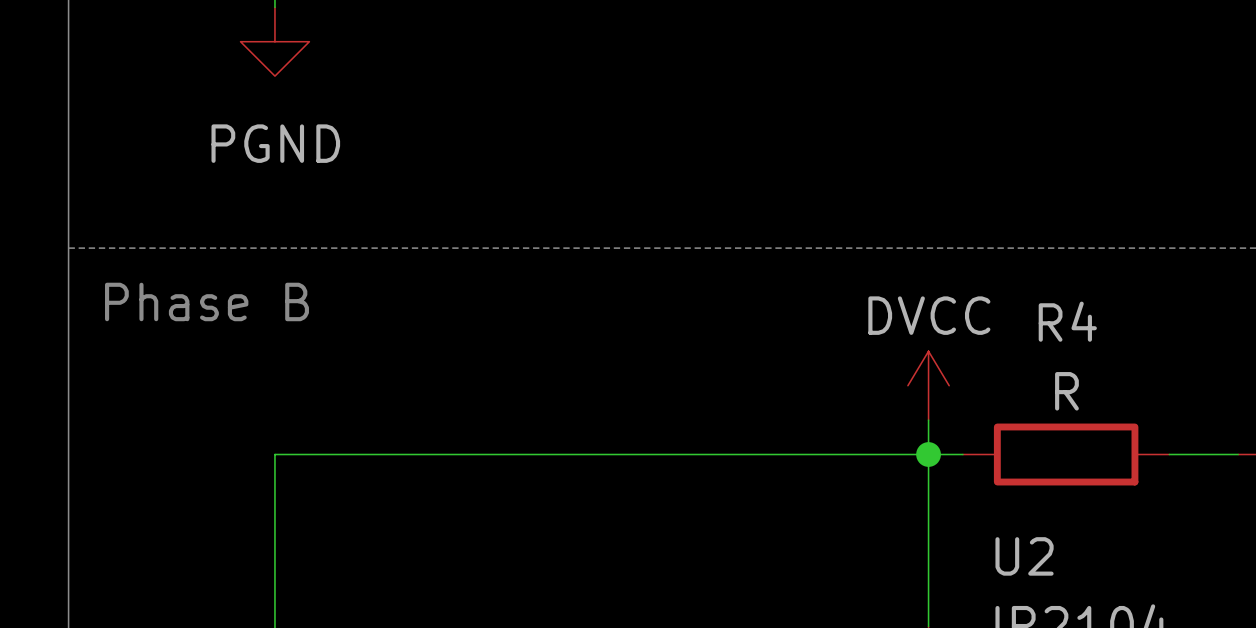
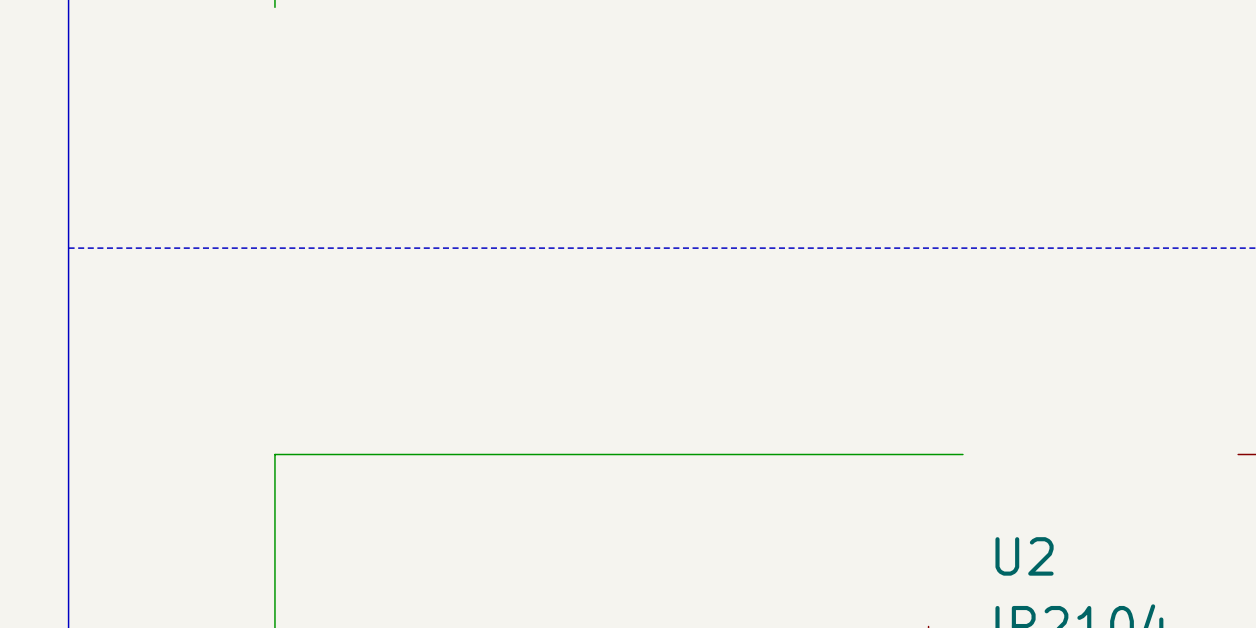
power symbol: PGND (274, 41) -> none
text: Phase B (206, 301) -> none
power symbol: DVCC (928, 385) -> none
wire: (928, 420) (928, 626) -> none
junction: (928, 454) -> none
R4: R (1066, 454) -> none
wire: (1169, 454) (1238, 454) -> none

